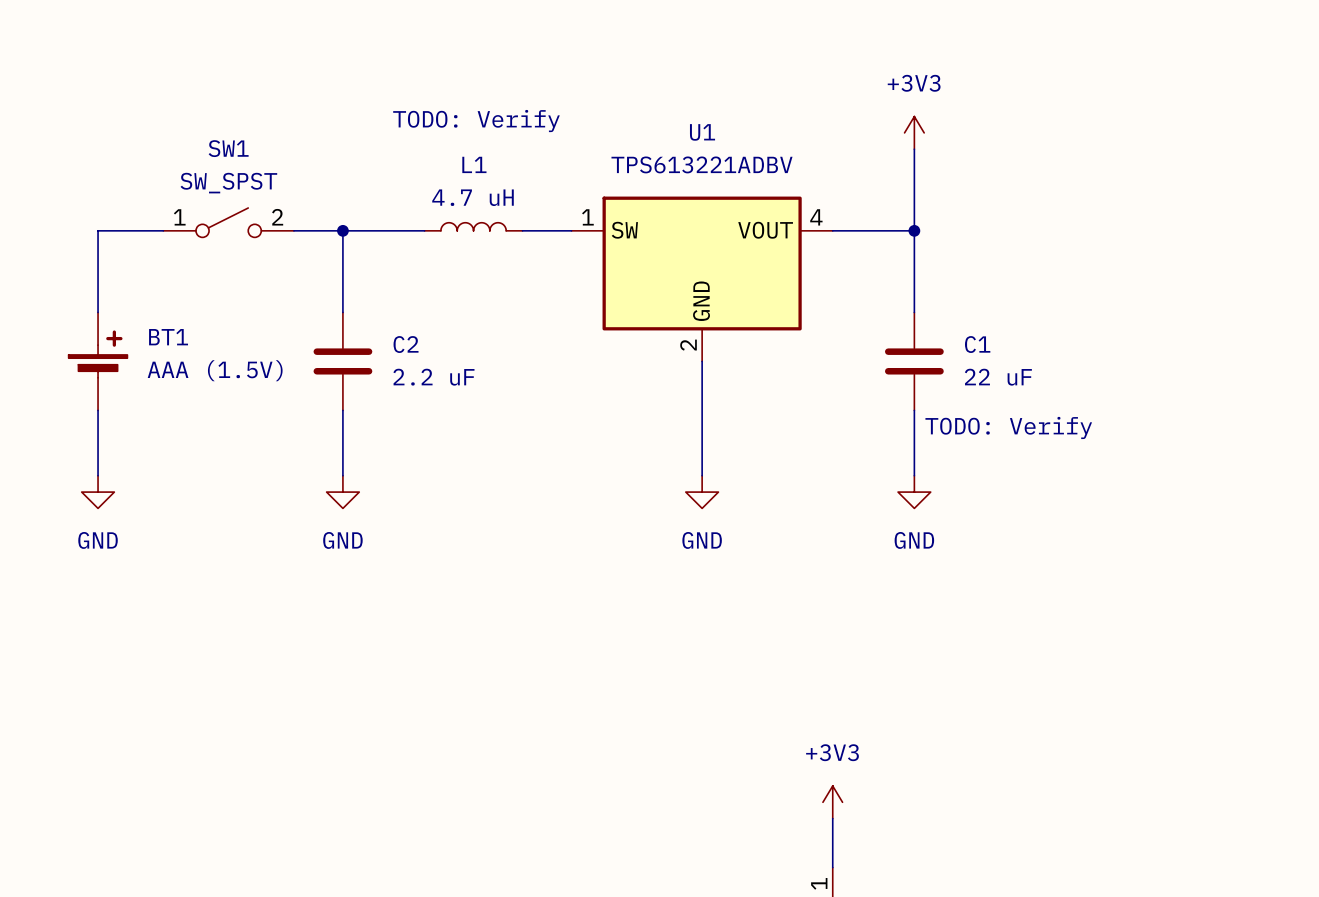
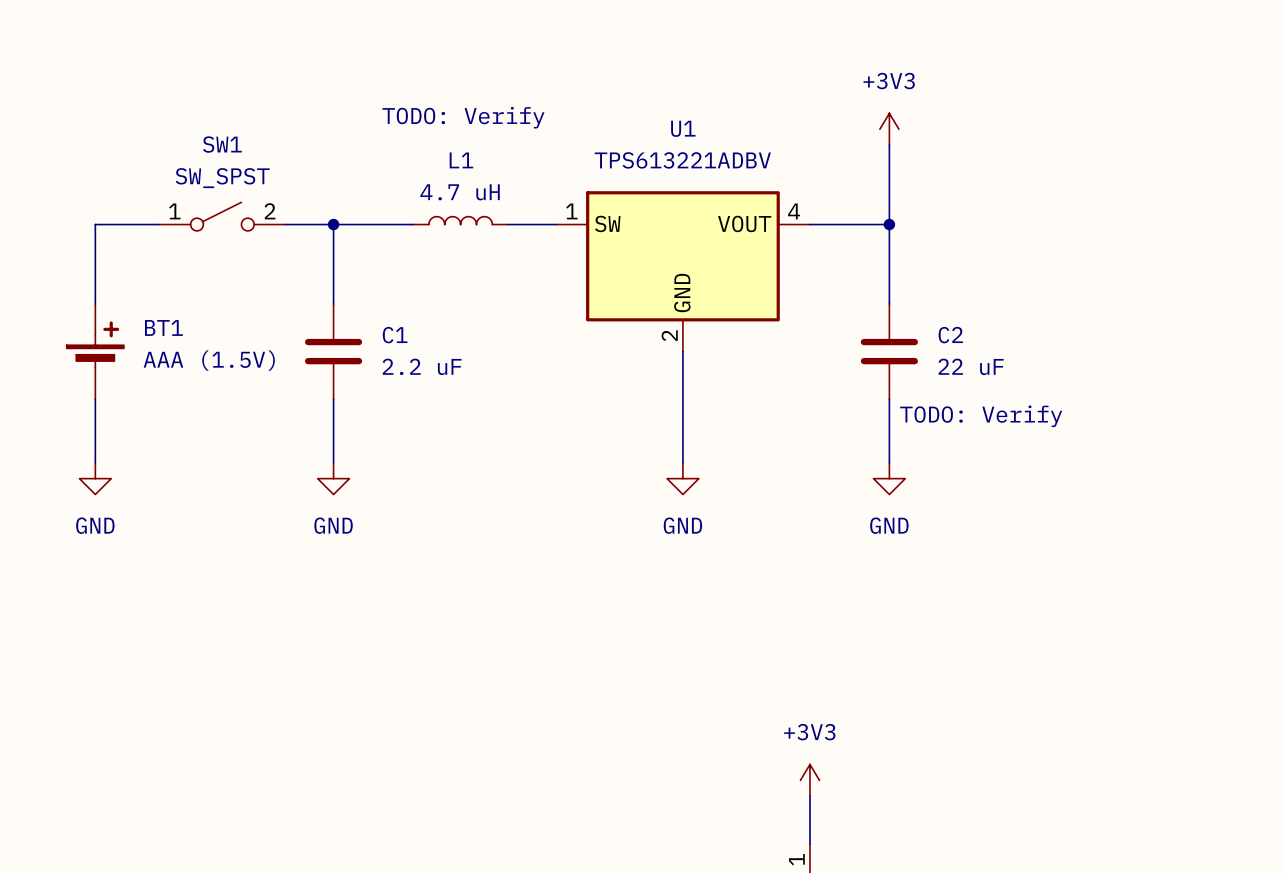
C2 name: C2 (406, 344) -> C1 (395, 335)
C1 name: C1 (977, 344) -> C2 (950, 335)

